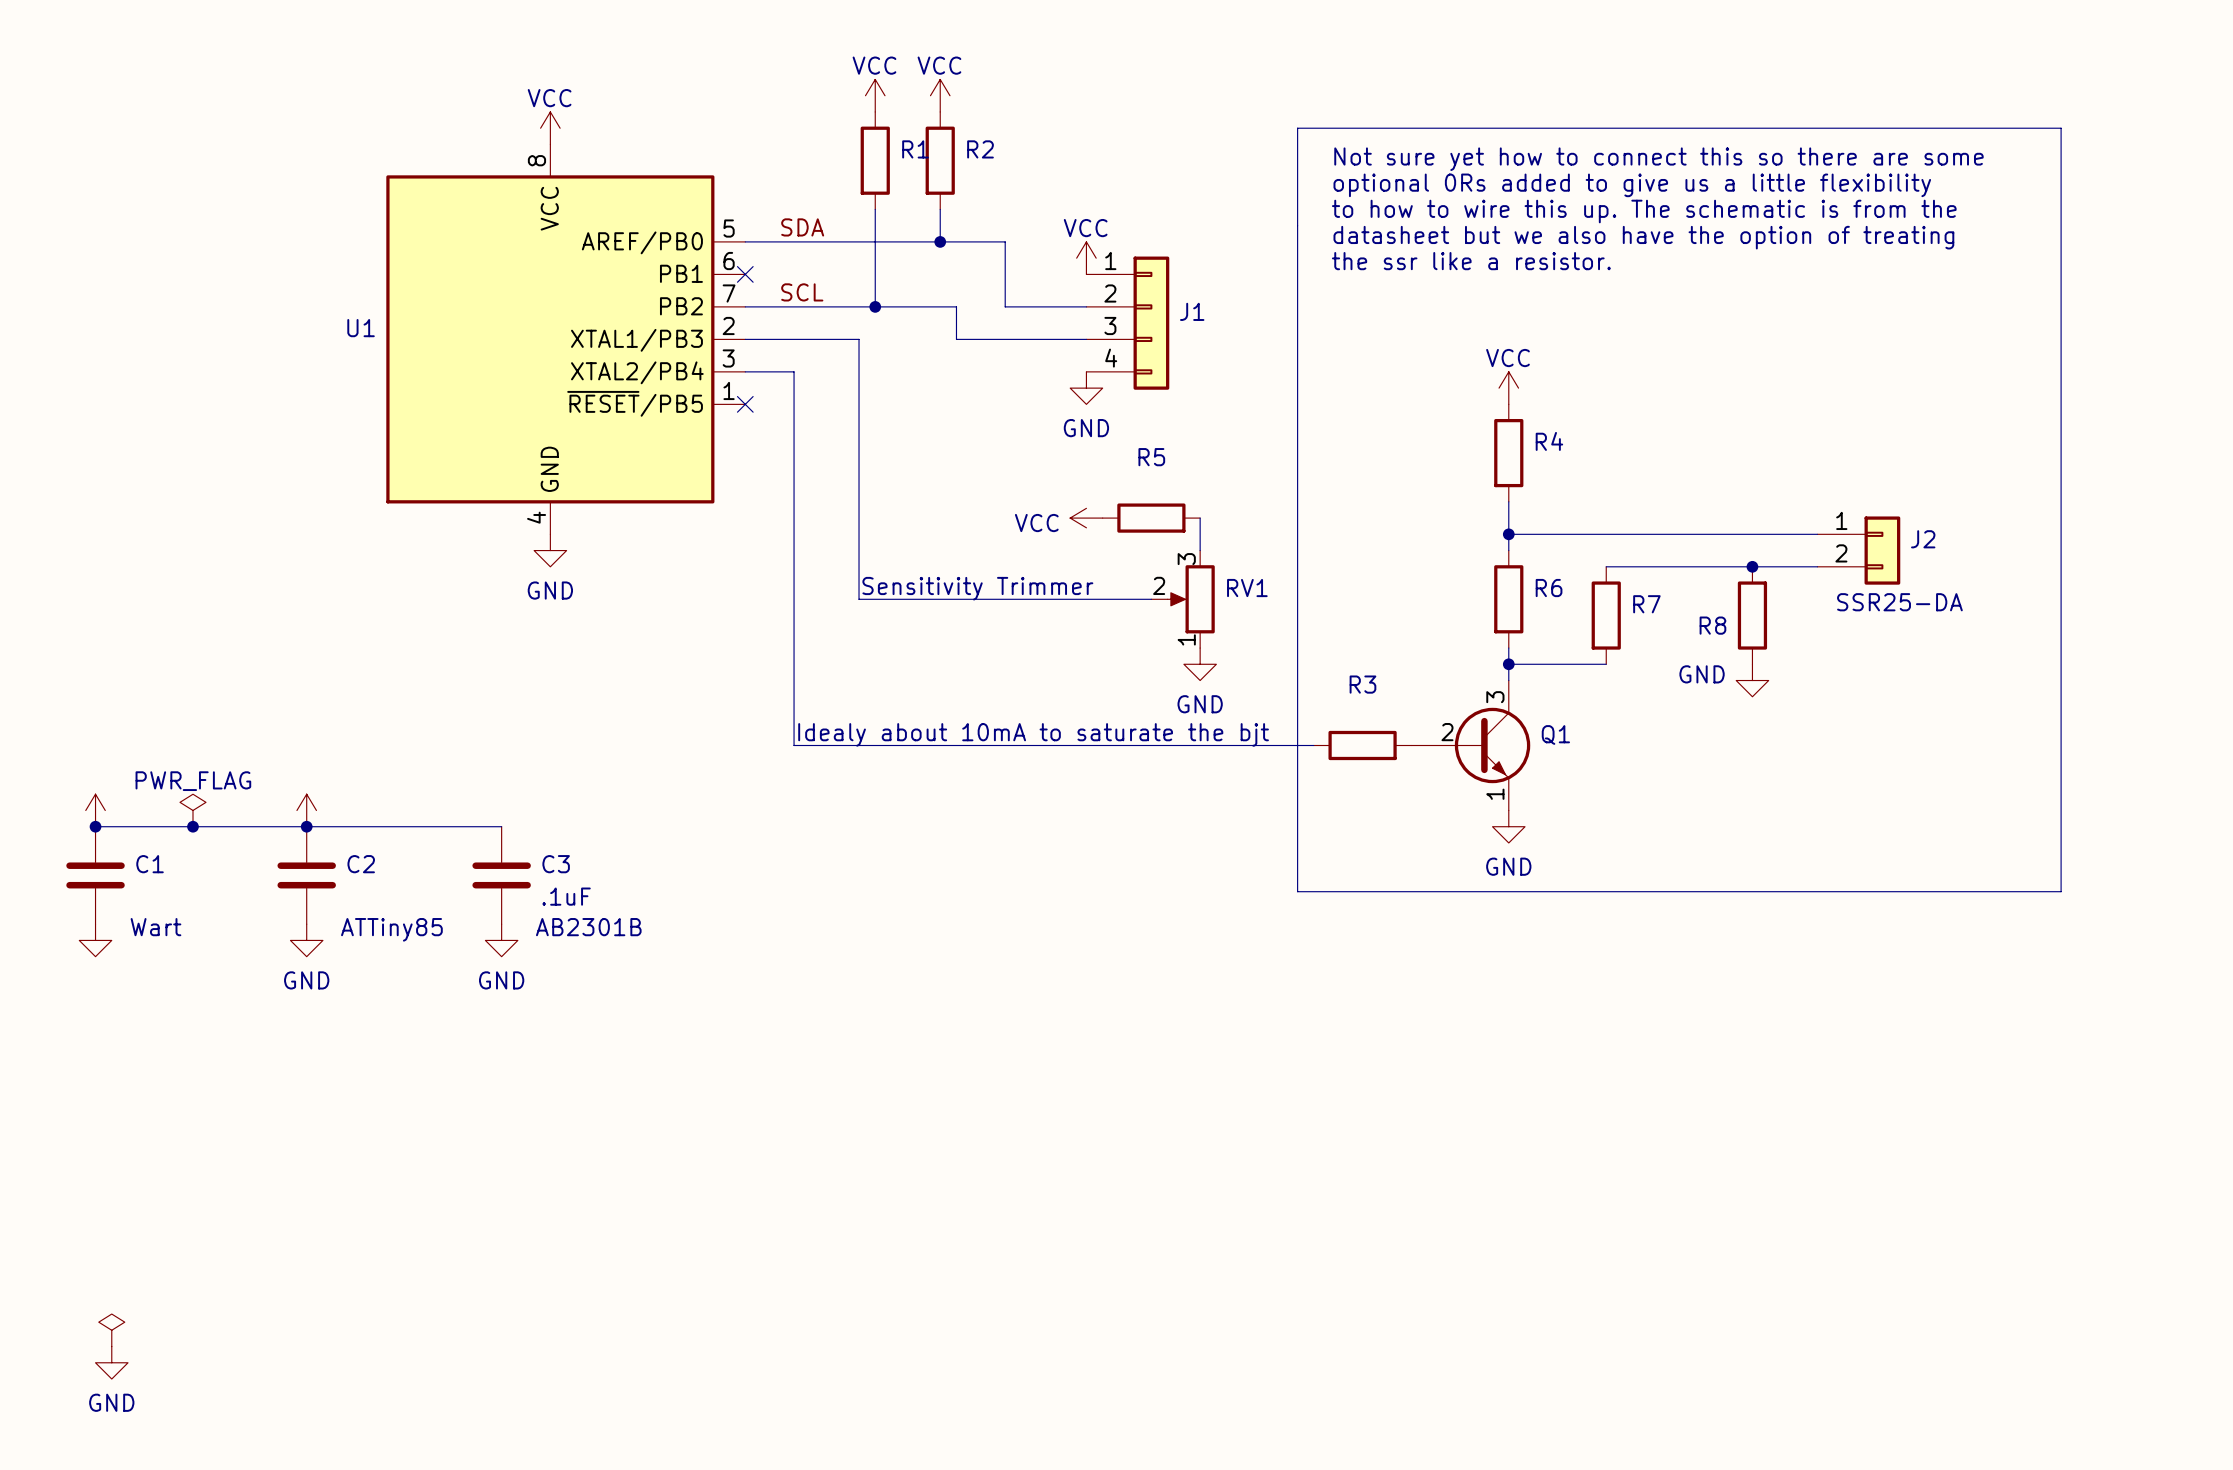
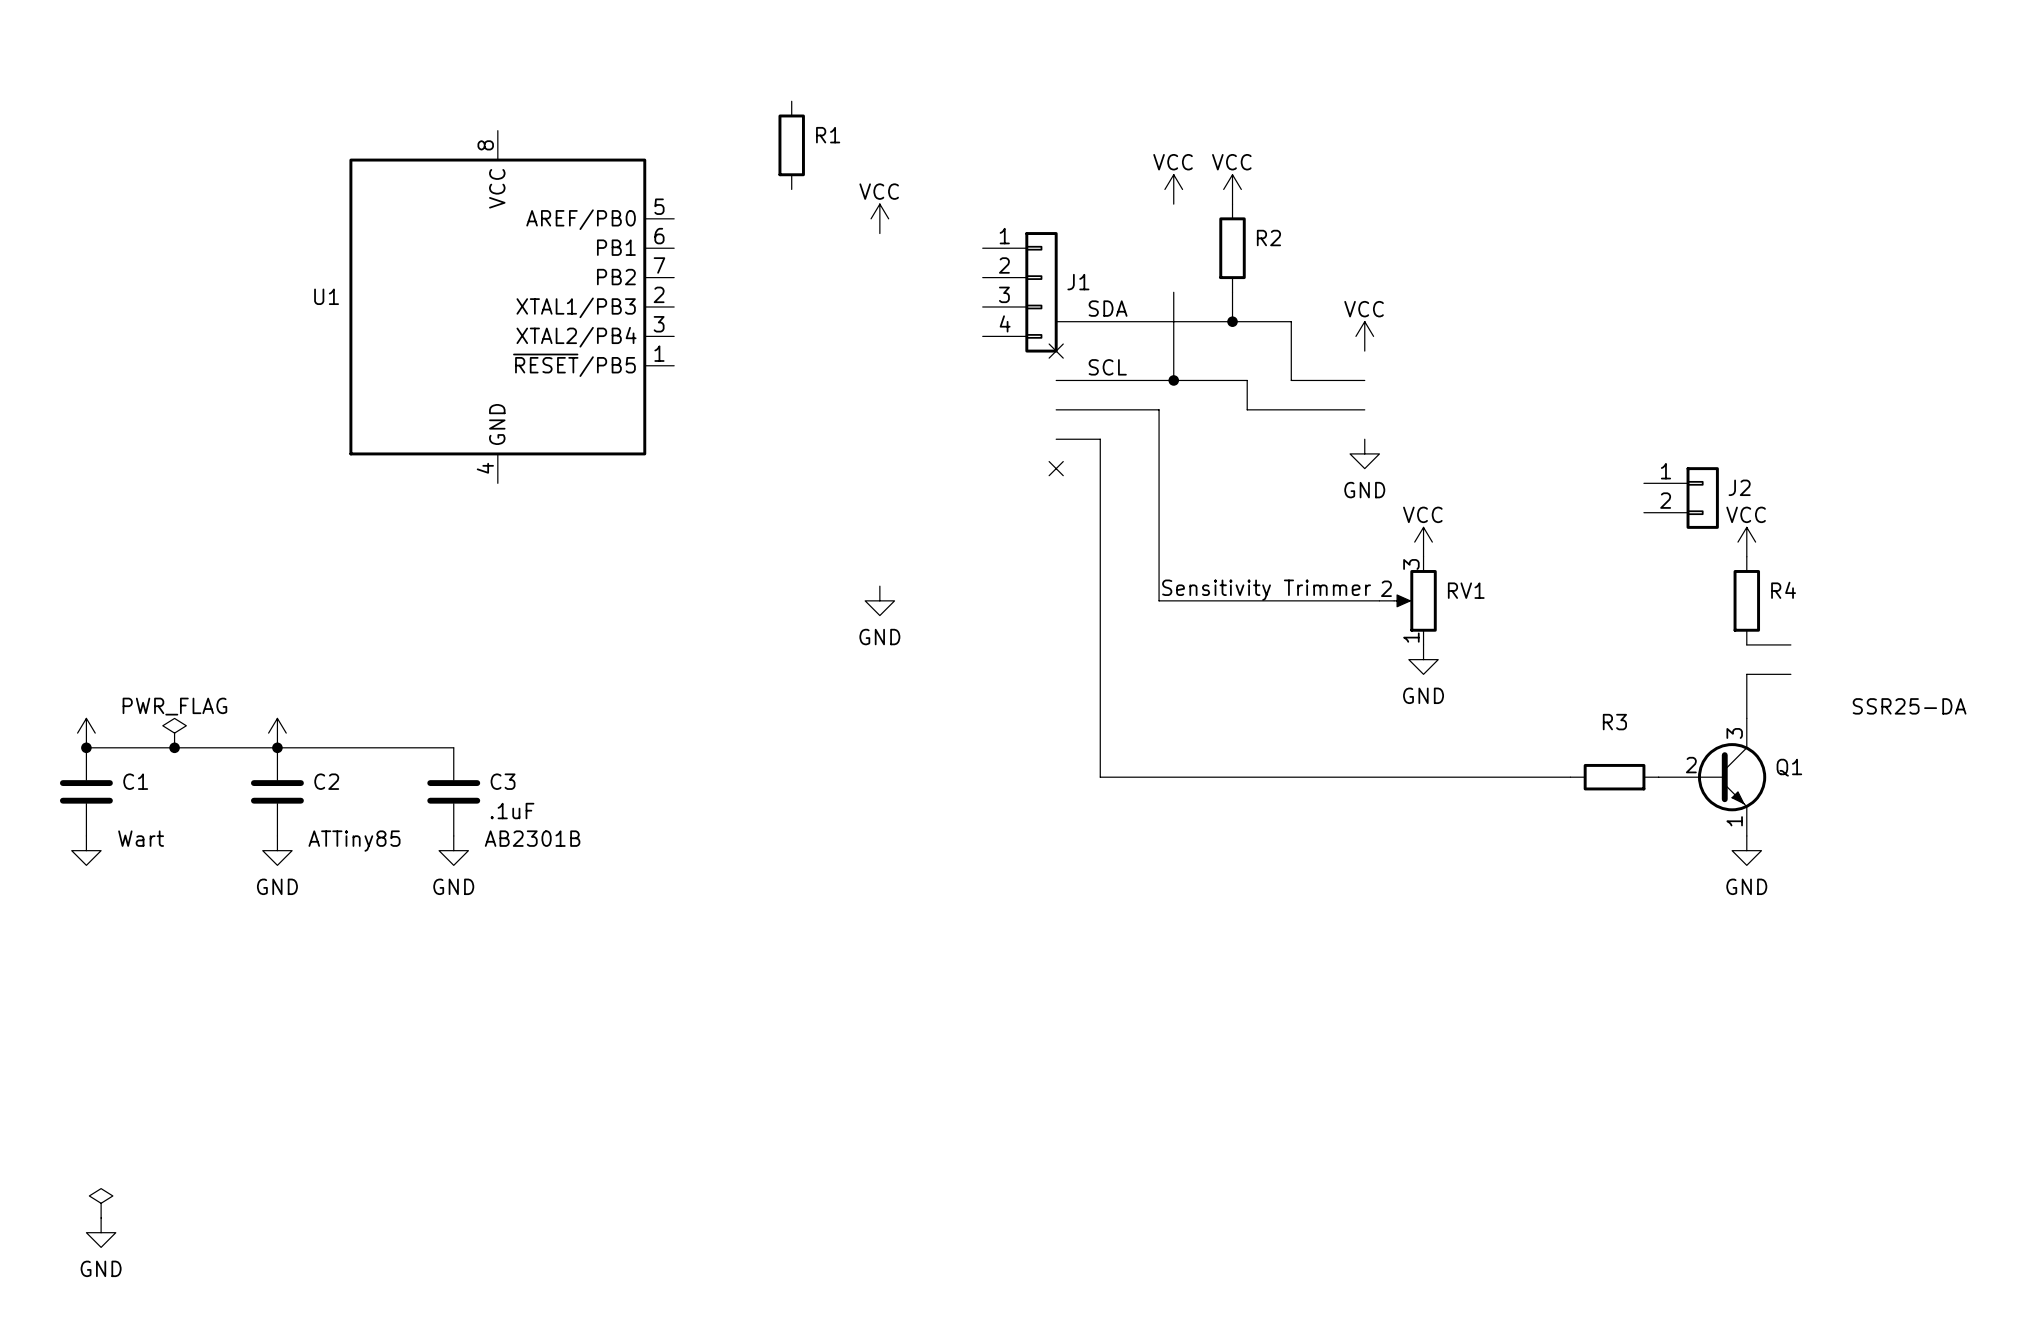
power symbol: VCC (875, 95) -> none
power symbol: VCC (940, 95) -> none
power symbol: VCC (550, 128) -> none
line: (1297, 128) (1297, 891) (2061, 891) (2061, 128) (1297, 128) -> none
text: Not sure yet how to connect this so there are some (1658, 159) -> none
R2 position: (940, 160) -> (1232, 248)
text: optional 0Rs added to give us a little flexibility (1632, 185) -> none
wire: (875, 209) (875, 306) -> none
wire: (940, 209) (940, 241) -> none
power symbol: none -> VCC (1173, 189)
power symbol: none -> VCC (1232, 189)
text: to how to wire this up. The schematic is from the (1644, 211) -> none
label: SDA (802, 227) -> none
text: datasheet but we also have the option of treating (1643, 237) -> none
wire: (745, 241) (1005, 241) (1005, 306) (1086, 306) -> none
junction: (940, 241) -> none
power symbol: none -> VCC (879, 218)
power symbol: VCC (1086, 258) -> none
text: the ssr like a resistor. (1471, 261) -> none
no-connect mark: (745, 274) -> none
label: SCL (802, 292) -> none
wire: (745, 306) (956, 306) (956, 339) (1086, 339) -> none
junction: (875, 306) -> none
wire: (745, 339) (859, 339) (859, 599) (1151, 599) -> none
label: none -> SDA (1108, 308)
wire: none -> (1056, 321) (1291, 321) (1291, 380) (1364, 380)
junction: none -> (1232, 321)
wire: (745, 371) (794, 371) (794, 745) (1313, 745) -> none
power symbol: GND (1086, 388) -> none
no-connect mark: none -> (1056, 351)
power symbol position: VCC (1508, 388) -> VCC (1364, 336)
no-connect mark: (745, 404) -> none
label: none -> SCL (1107, 367)
wire: none -> (1056, 380) (1247, 380) (1247, 409) (1364, 409)
junction: none -> (1173, 380)
wire: none -> (1056, 409) (1159, 409) (1159, 600) (1364, 600)
R4 position: (1508, 453) -> (1746, 600)
wire: none -> (1056, 439) (1100, 439) (1100, 777) (1570, 777)
wire: (1508, 501) (1508, 550) -> none
power symbol: none -> GND (1364, 453)
power symbol: VCC (1086, 518) -> none
R5: (1151, 518) -> none
no-connect mark: none -> (1056, 468)
wire: (1200, 518) (1200, 550) -> (1232, 292) (1232, 321)
wire: (1508, 534) (1817, 534) -> none
junction: (1508, 534) -> none
power symbol: GND (550, 550) -> none
wire: (1606, 566) (1817, 566) -> none
junction: (1752, 566) -> none
text: Sensitivity Trimmer (977, 588) -> none
RV1 position: (1183, 599) -> (1408, 600)
R6: (1508, 599) -> none
power symbol: none -> VCC (1423, 542)
power symbol: none -> VCC (1746, 542)
text position: SSR25-DA (1899, 602) -> SSR25-DA (1909, 706)
R7: (1606, 615) -> none
R8: (1752, 615) -> none
wire: (1508, 648) (1508, 680) -> none
label: none -> Sensitivity Trimmer (1266, 590)
power symbol: none -> GND (879, 600)
power symbol: GND (1200, 664) -> none
junction: (1508, 664) -> none
wire: (1525, 664) (1606, 664) -> none
power symbol: GND (1752, 680) -> none
wire: none -> (1746, 644) (1790, 644)
power symbol: none -> GND (1423, 659)
text: Idealy about 10mA to saturate the bjt (1033, 734) -> none
R3 position: (1362, 745) -> (1614, 777)
Q1 position: (1470, 745) -> (1712, 777)
wire: none -> (1790, 674) (1746, 674) (1746, 718)
power symbol: GND (1508, 826) -> none
power symbol: none -> GND (1746, 850)

